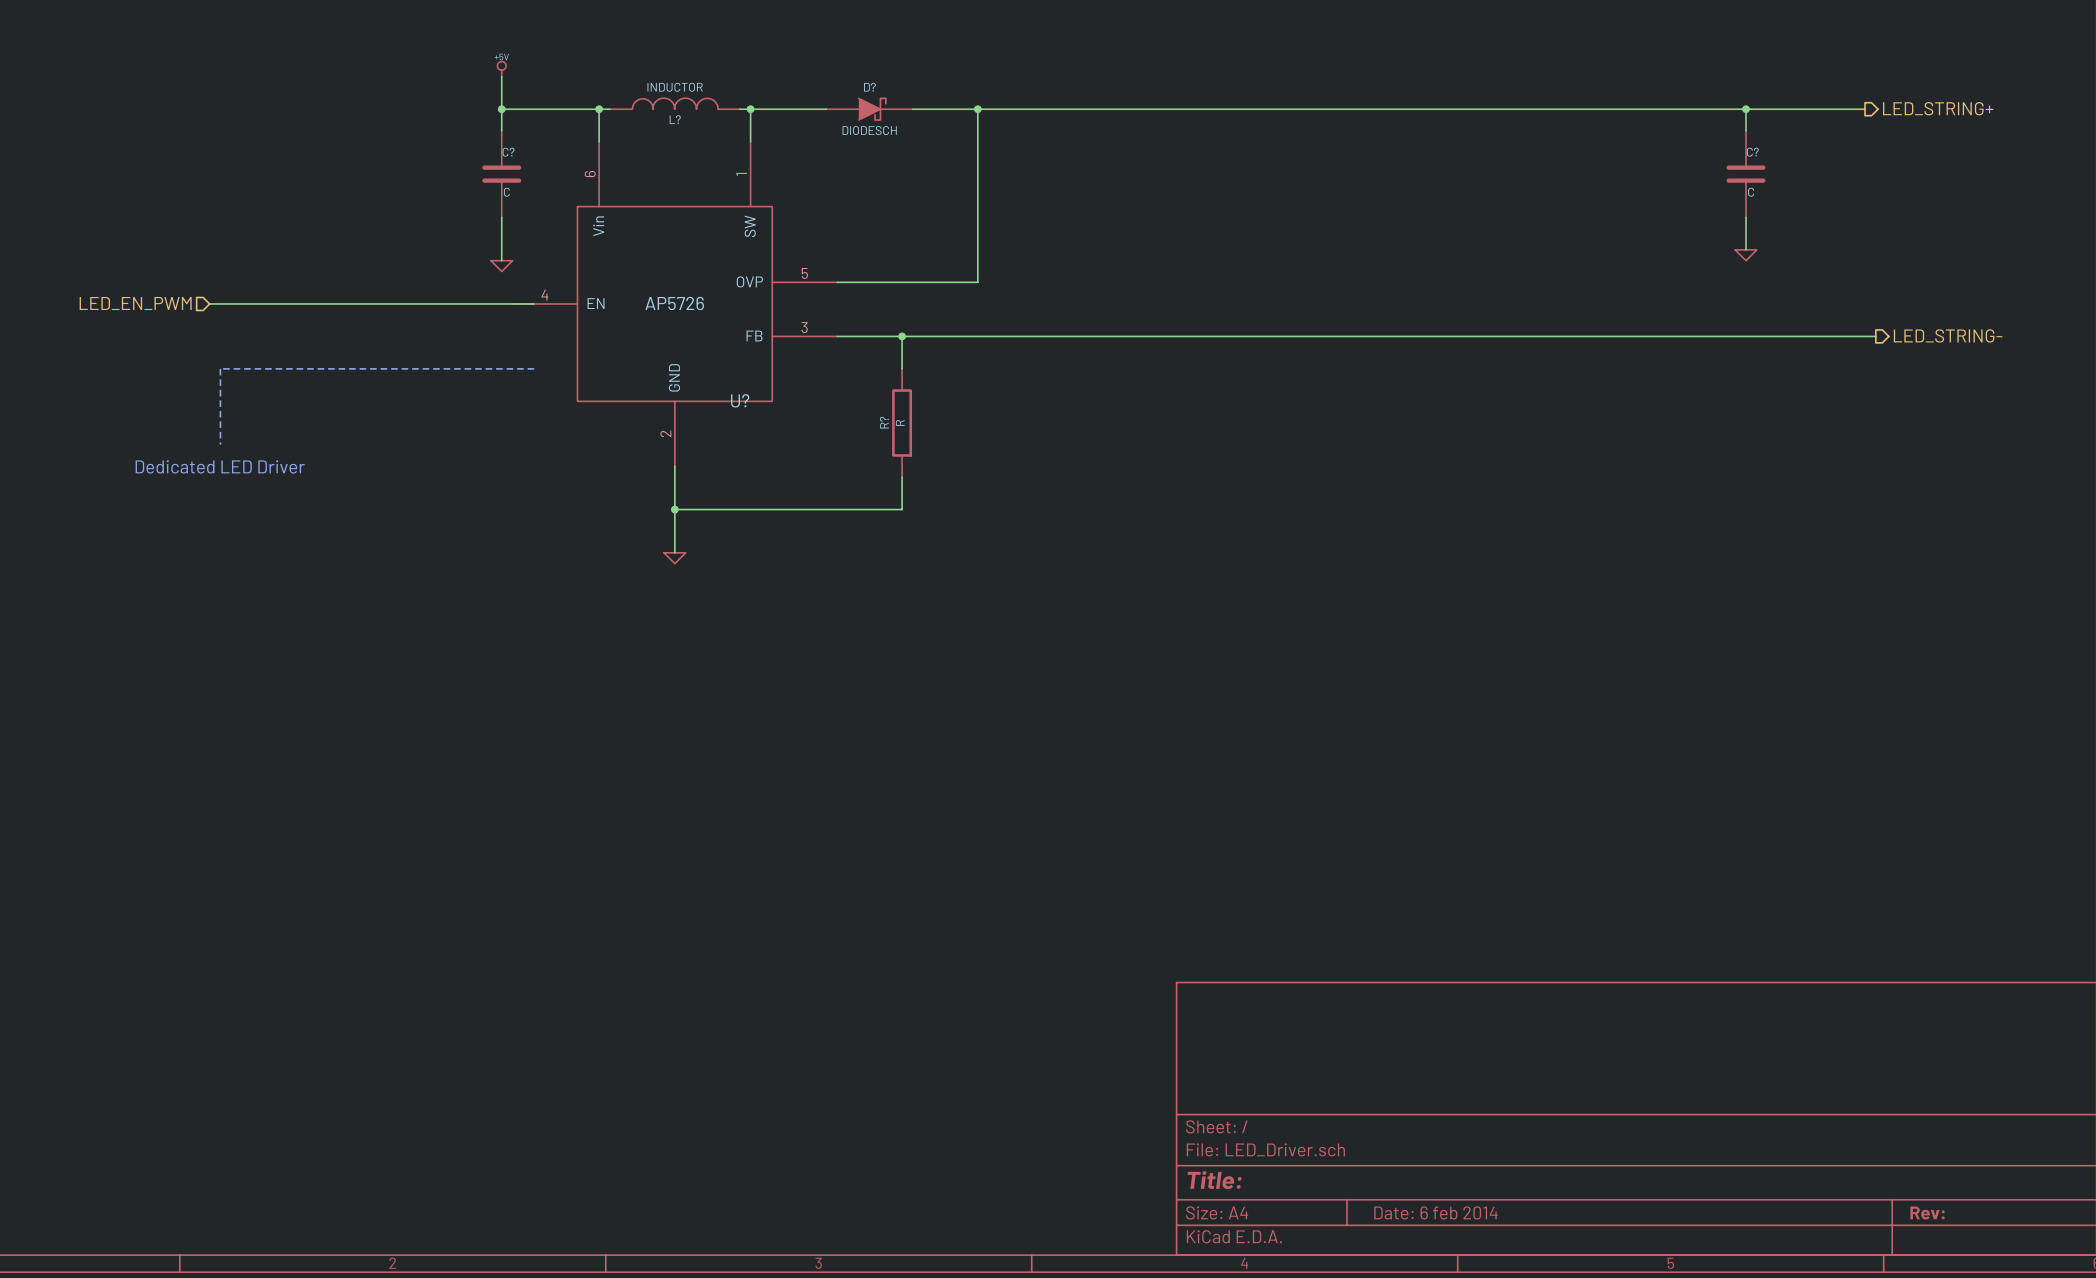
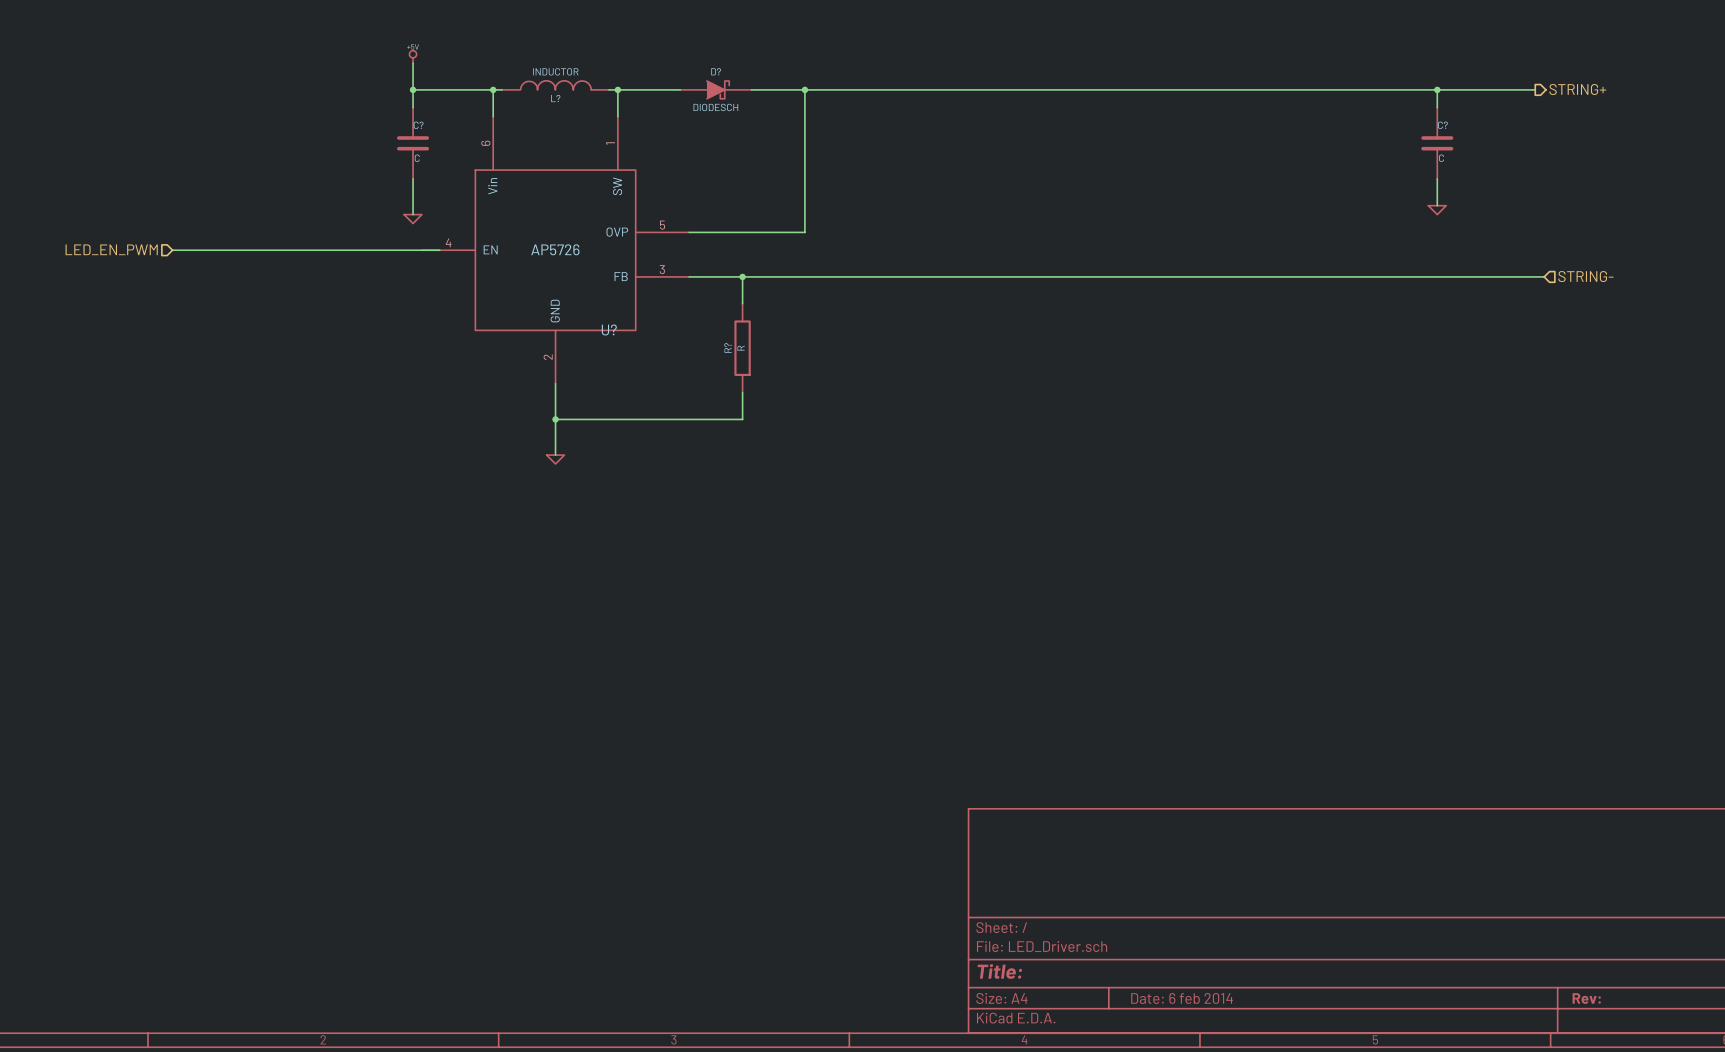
hierarchical label: LED_STRING+ (1938, 108) -> STRING+ (1577, 89)
hierarchical label shape: output (1948, 335) -> input (1585, 276)
hierarchical label: LED_STRING- (1948, 335) -> STRING- (1585, 276)
line: (534, 368) (220, 368) (220, 444) -> none
text: Dedicated LED Driver (220, 466) -> none

